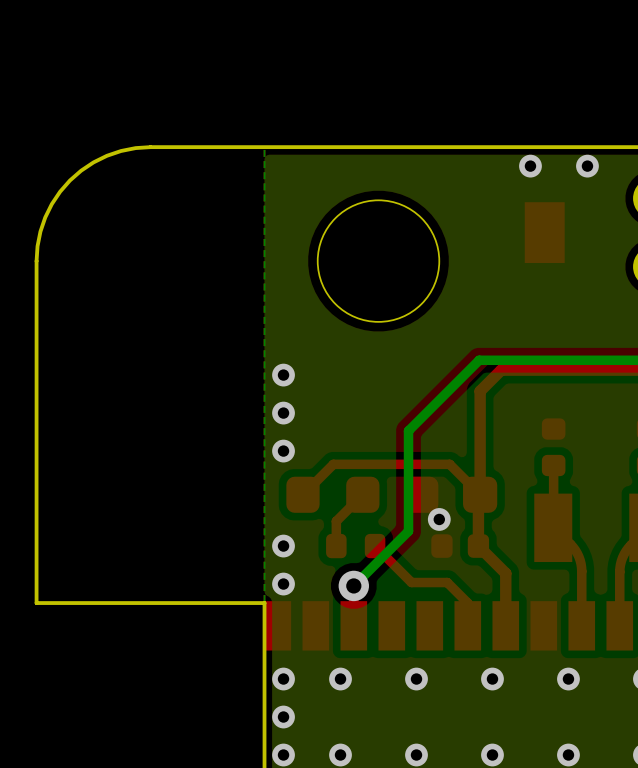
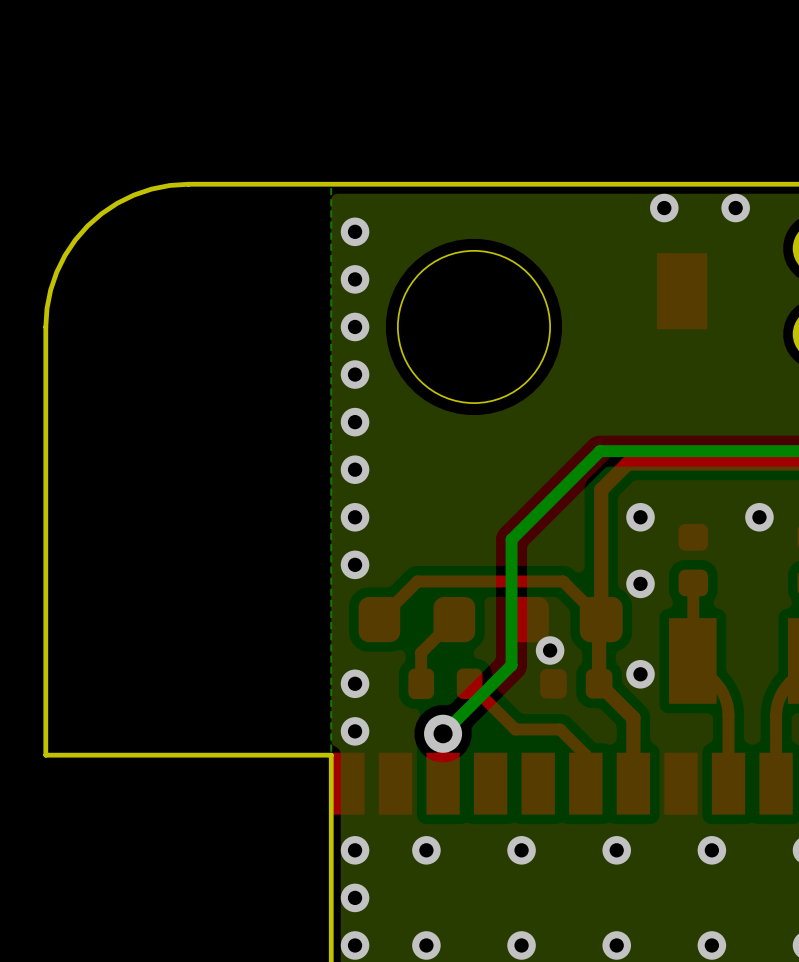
via: none -> (355, 231)
via: none -> (355, 279)
via: none -> (355, 326)
via: none -> (355, 374)
via: none -> (355, 422)
via: none -> (640, 517)
via: none -> (759, 517)
via: none -> (640, 583)
via: none -> (640, 674)

